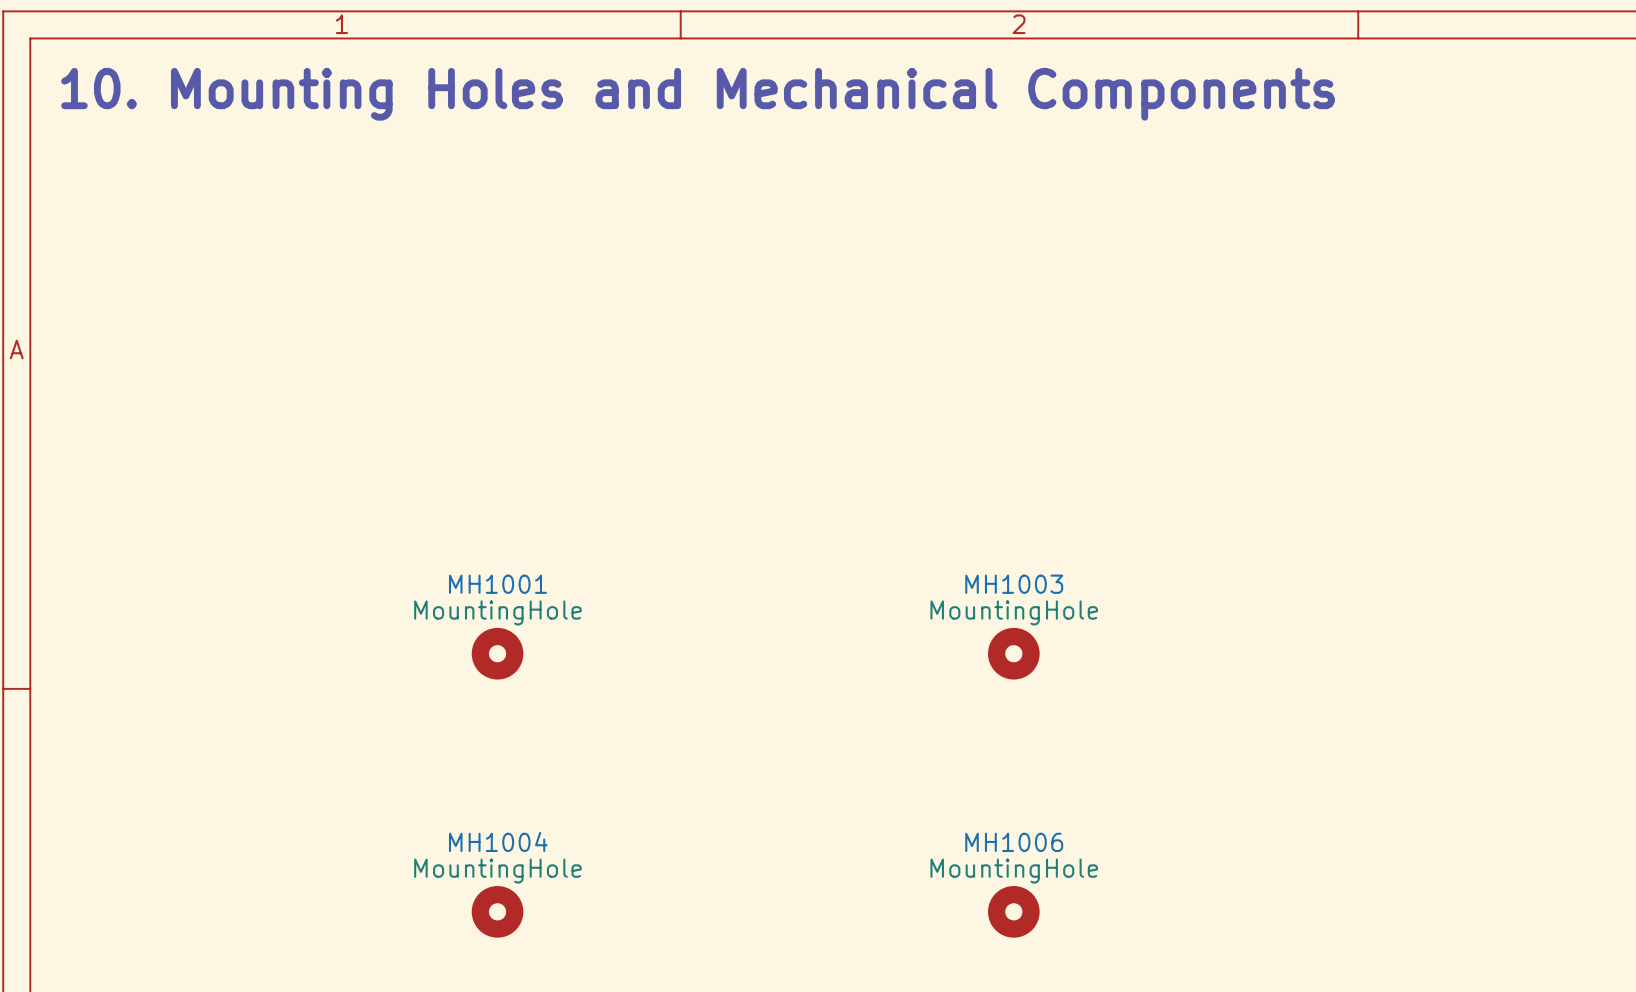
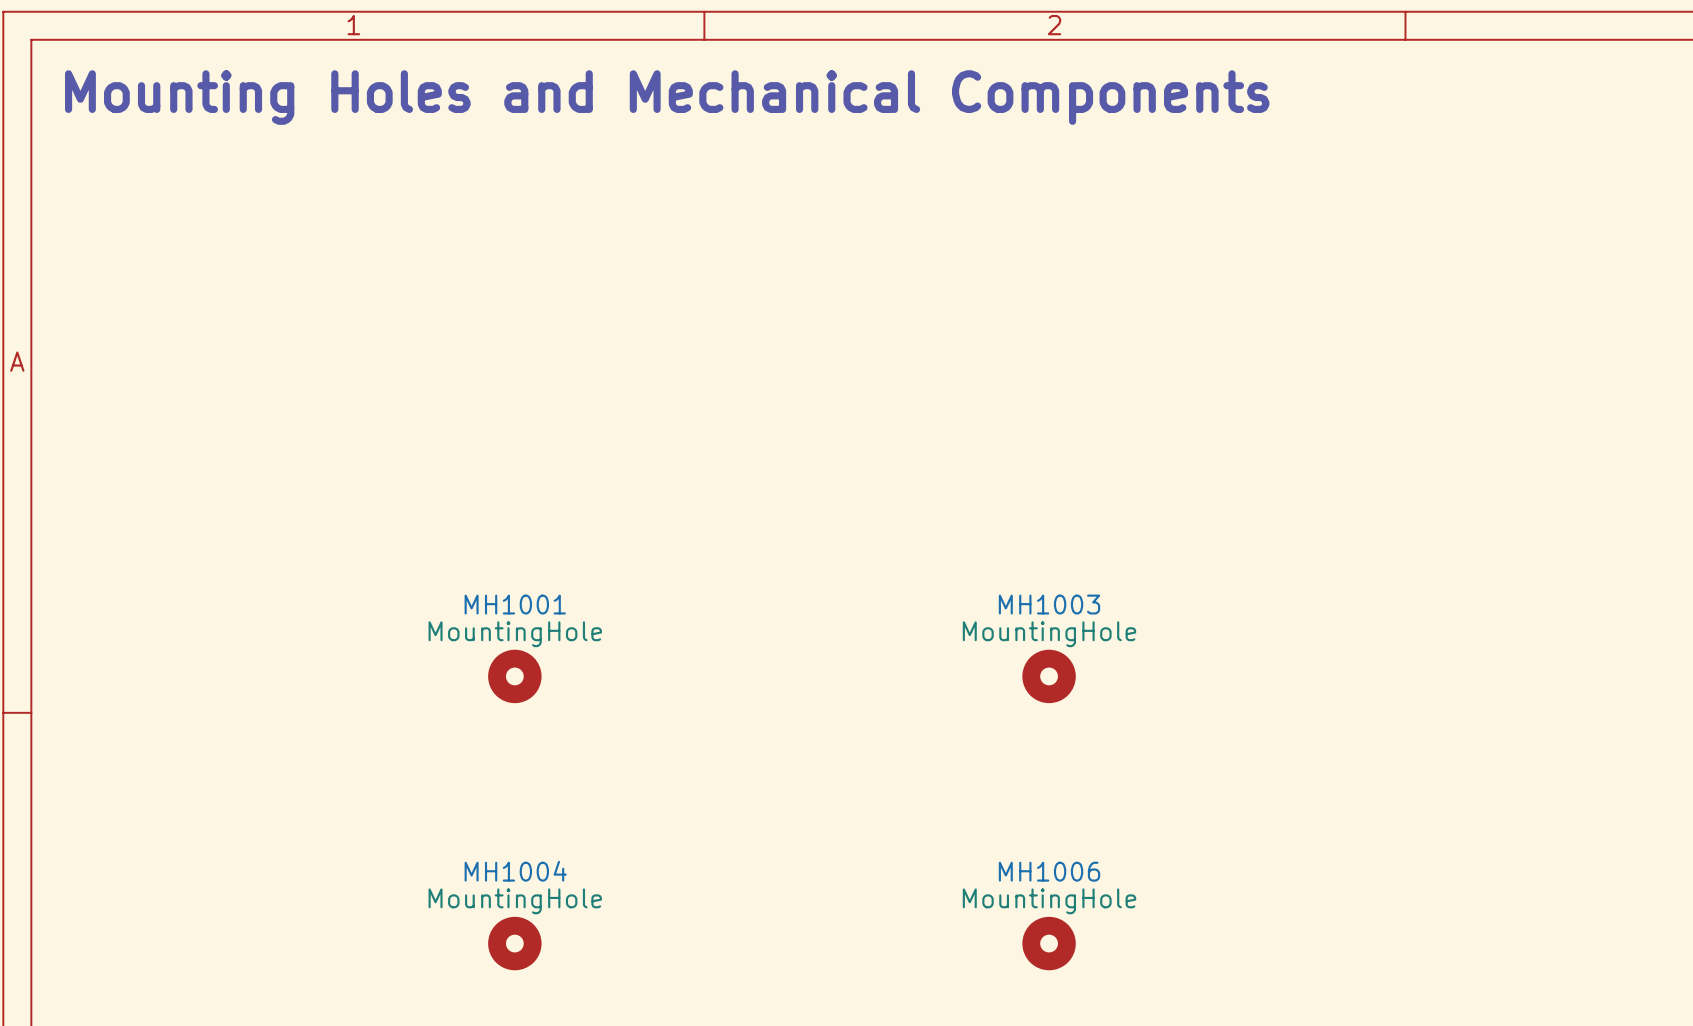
text: 10. Mounting Holes and Mechanical Components (698, 94) -> Mounting Holes and Mechanical Components (667, 97)

